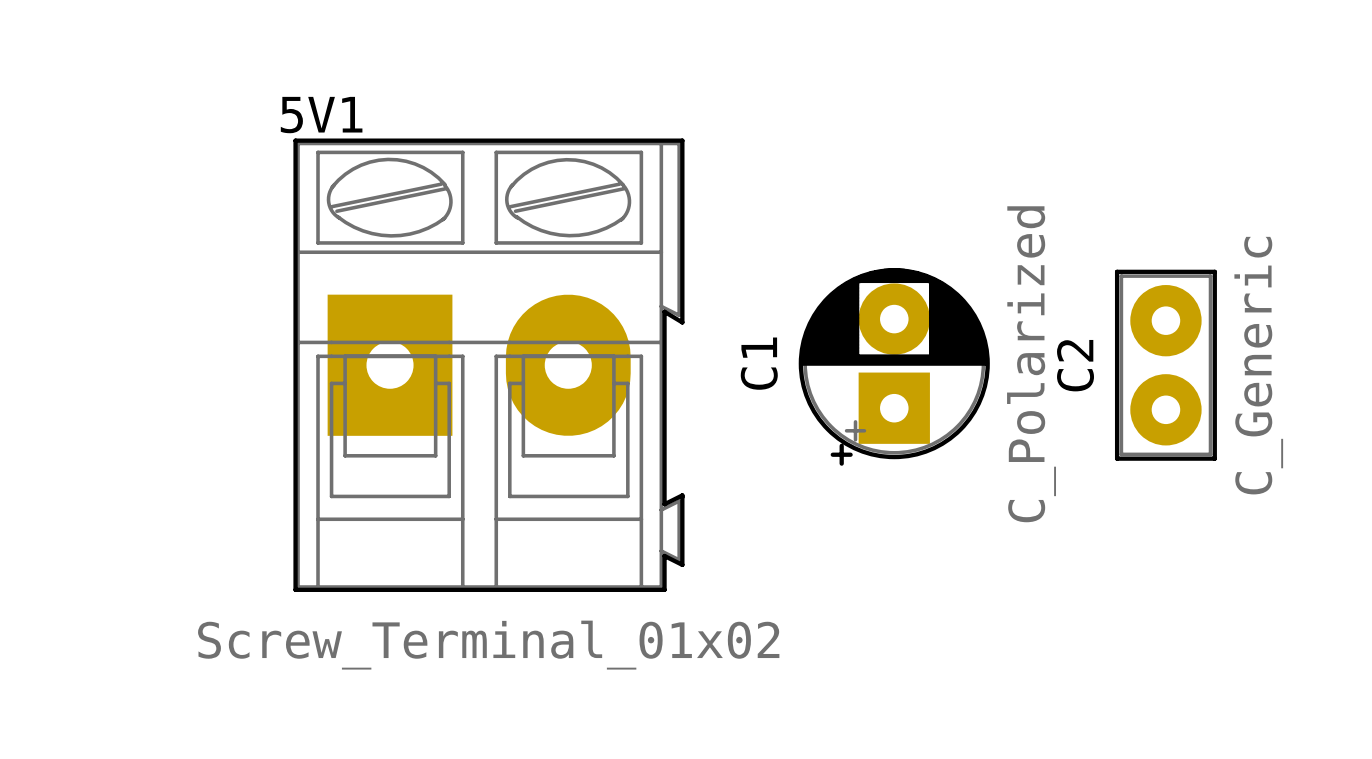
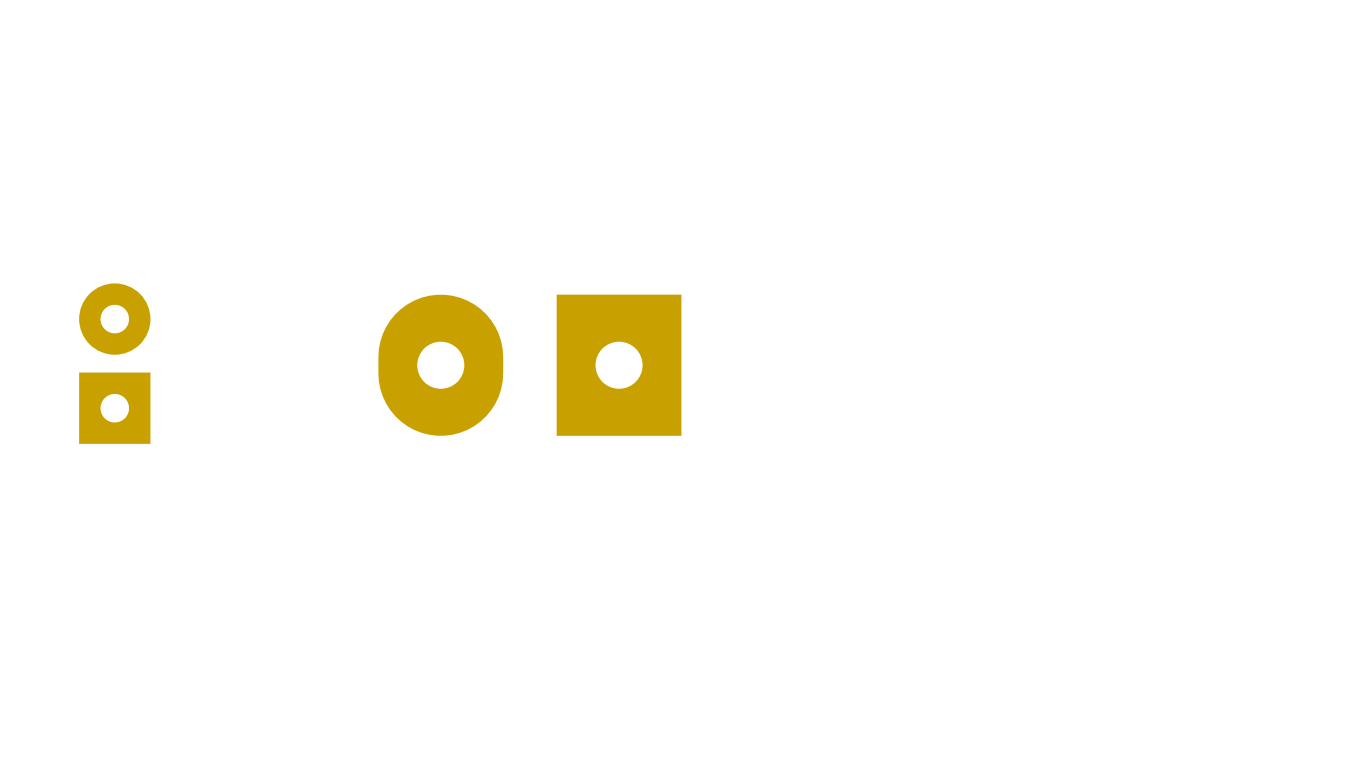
5V1 side: top (488, 365) -> bottom (529, 365)
C2: C_Generic (1165, 365) -> none
C1 side: top (894, 366) -> bottom (114, 363)

